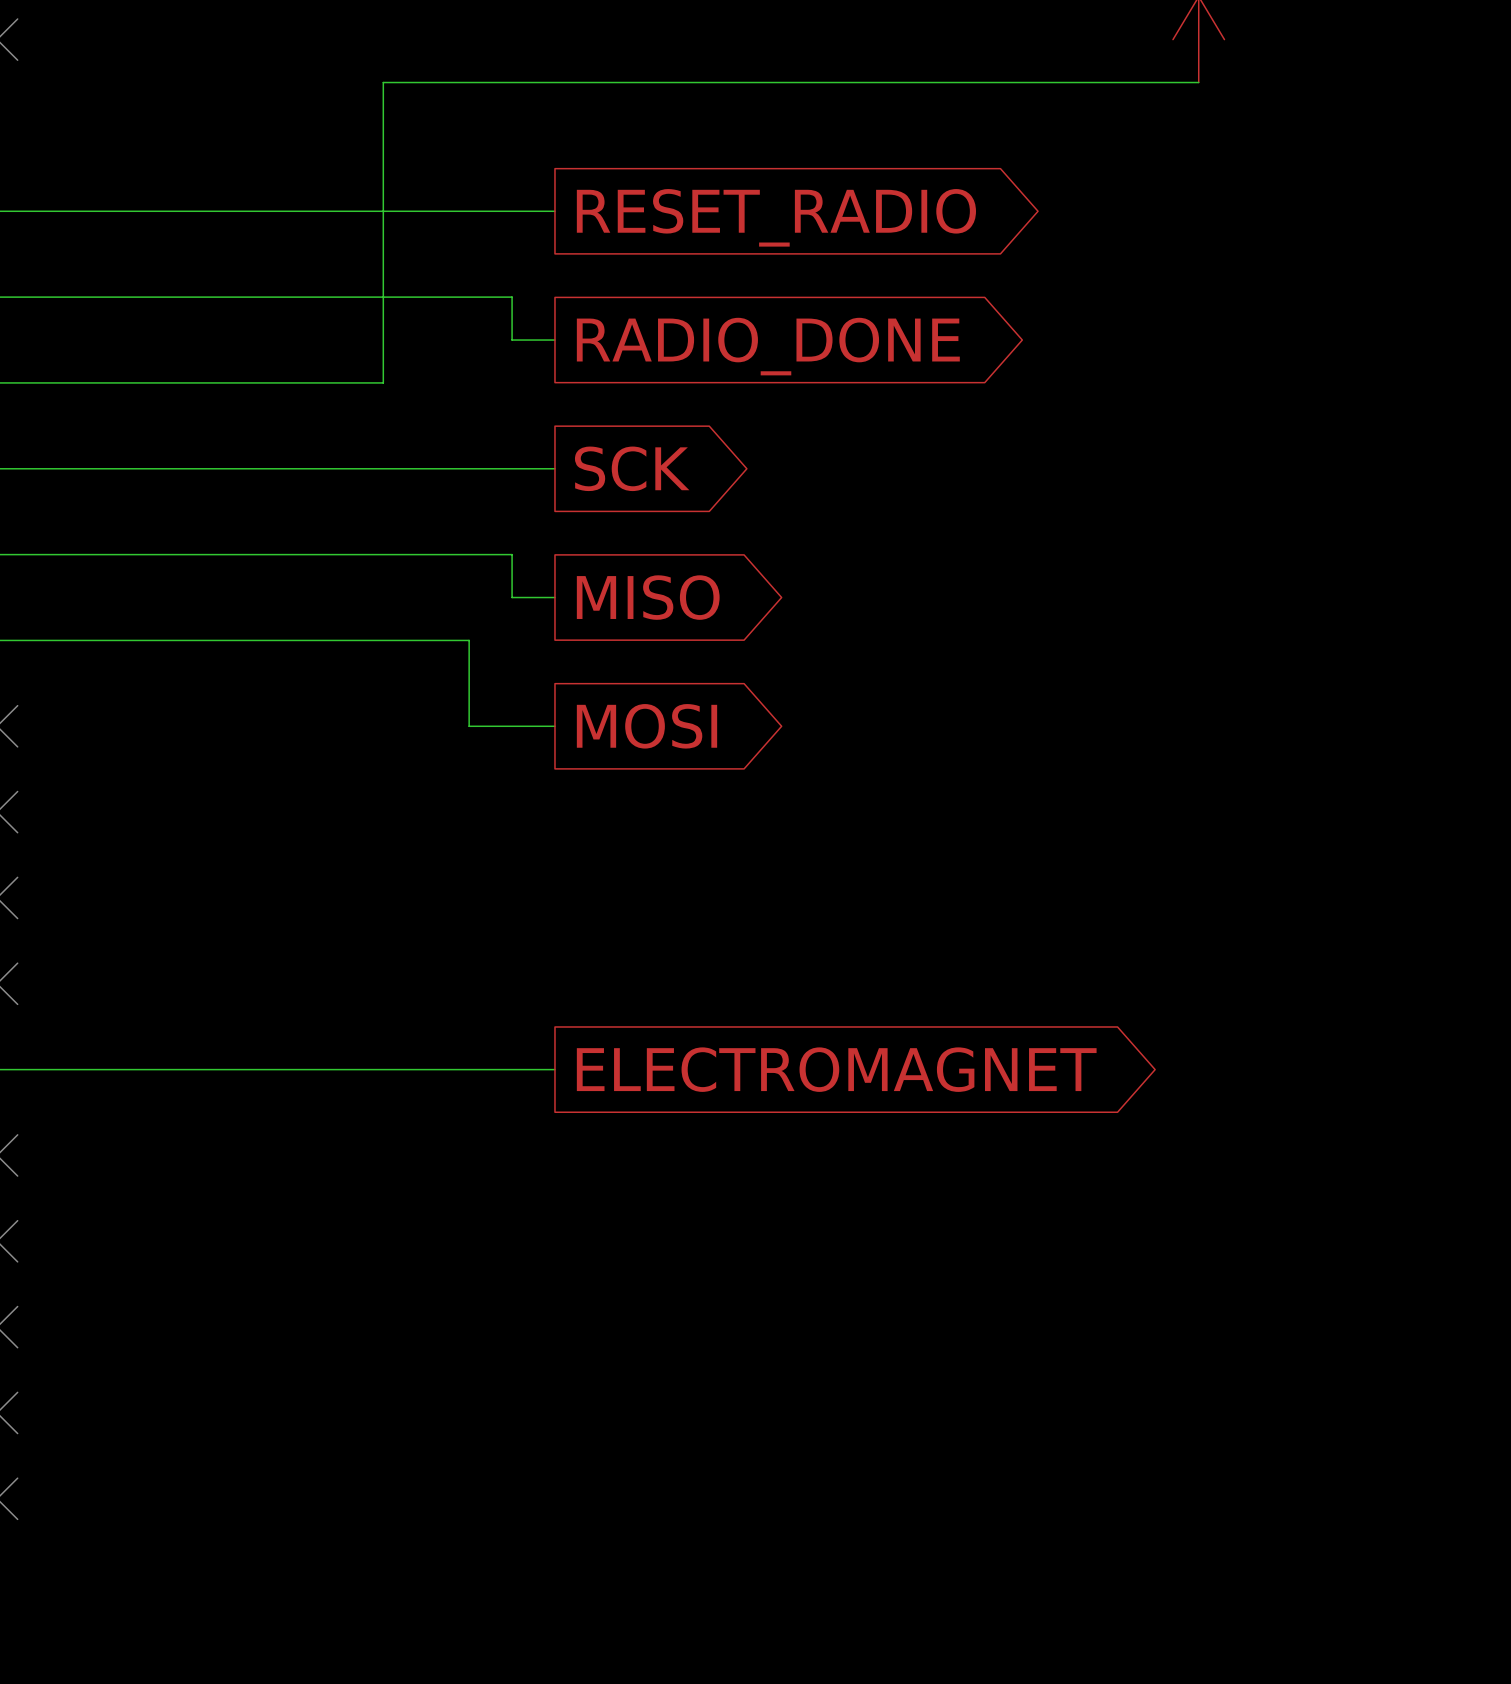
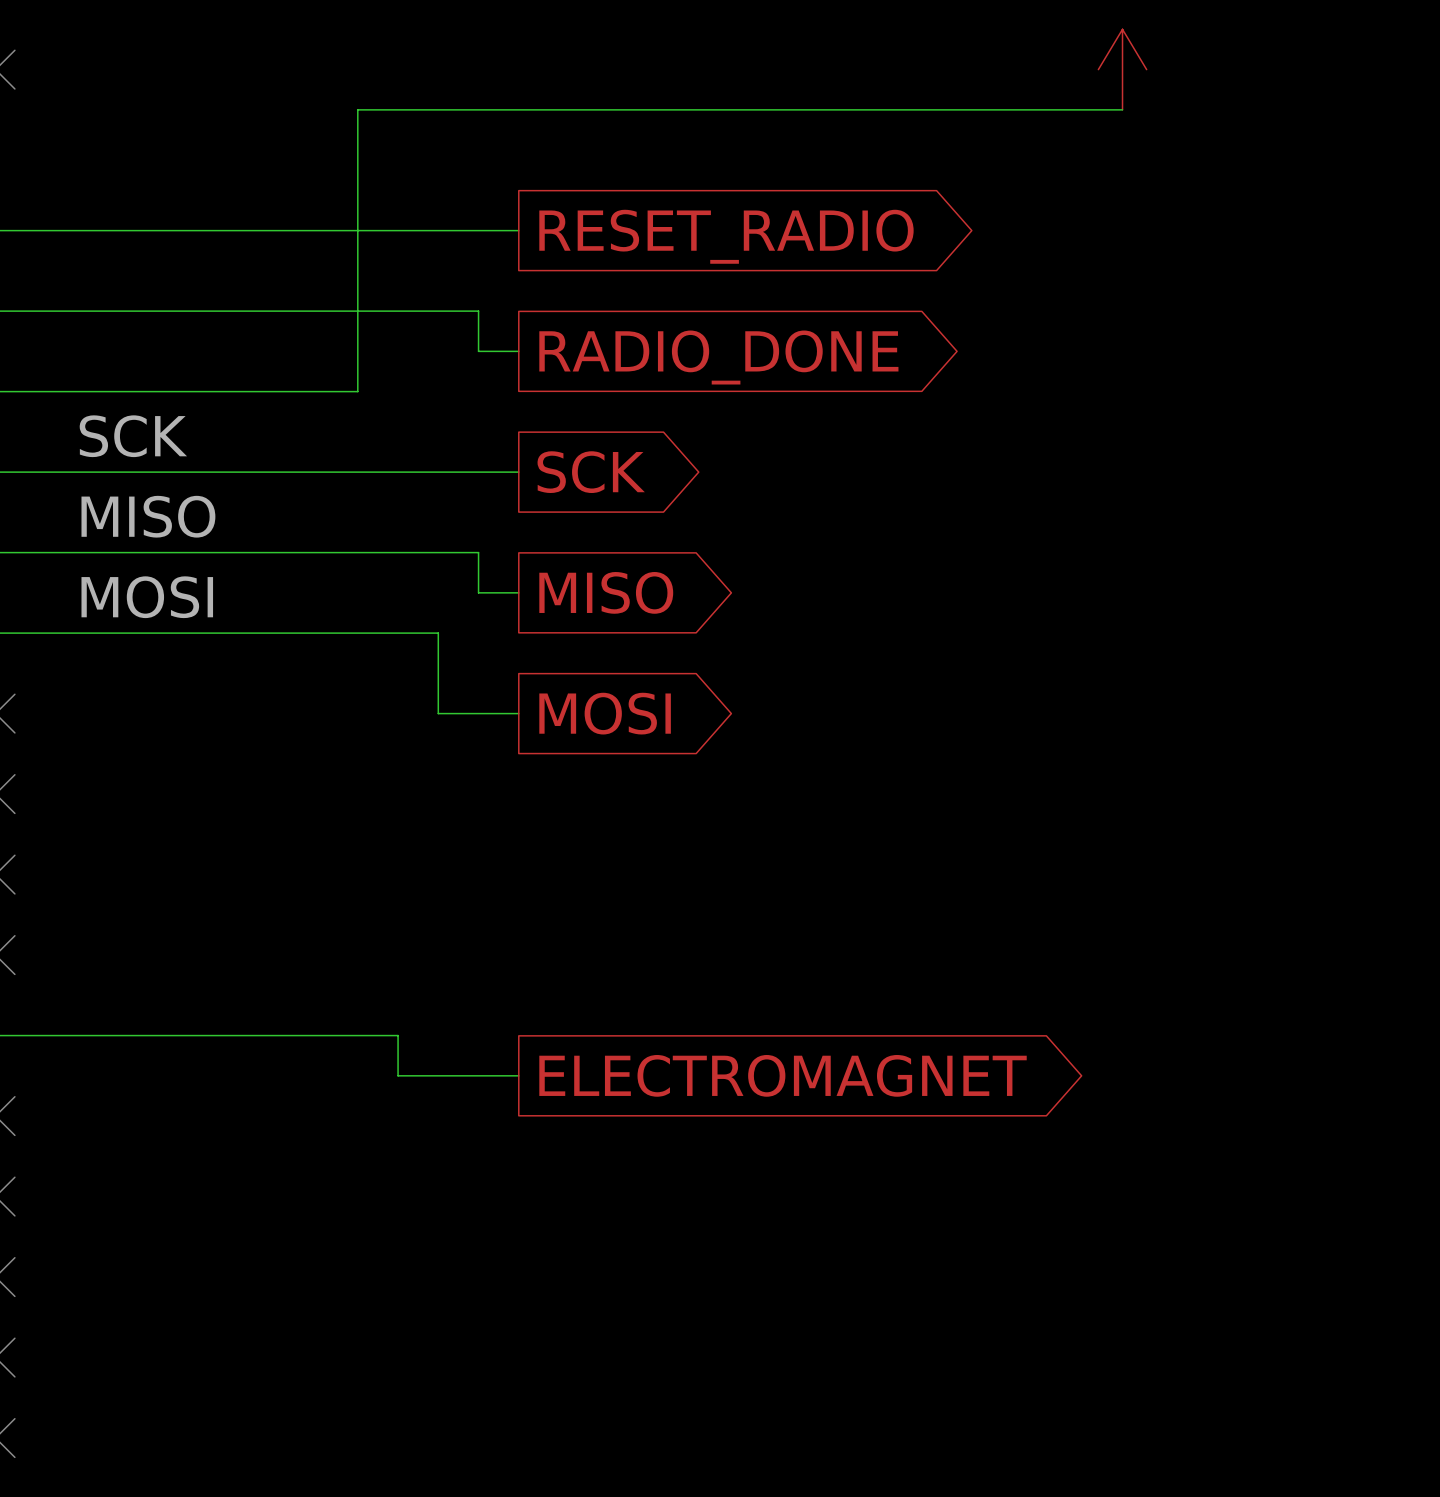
label: none -> SCK (133, 436)
label: none -> MISO (148, 516)
label: none -> MOSI (147, 597)
wire: (426, 1069) (554, 1069) -> (398, 1035) (398, 1075) (518, 1075)
global label position: ELECTROMAGNET (836, 1069) -> ELECTROMAGNET (783, 1075)

